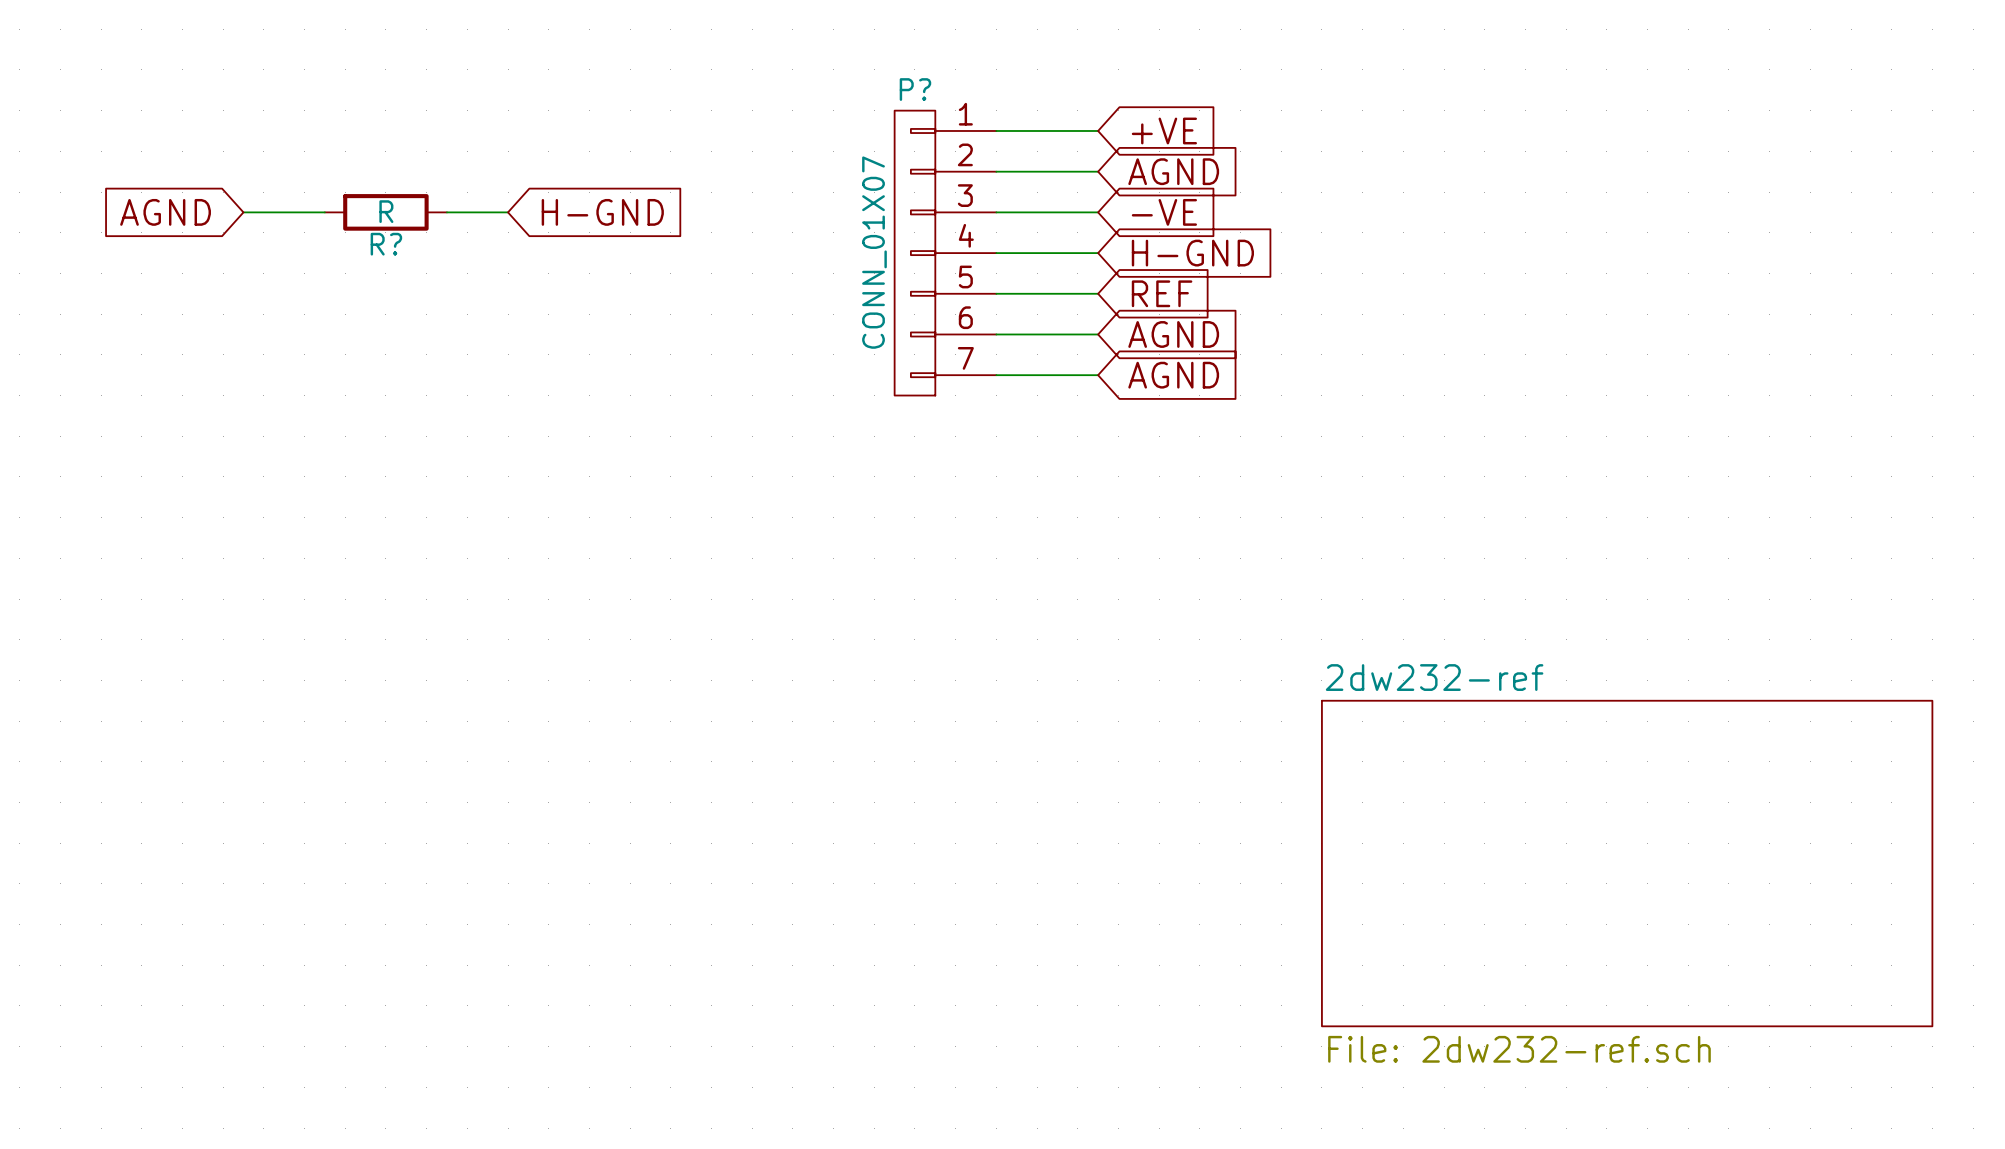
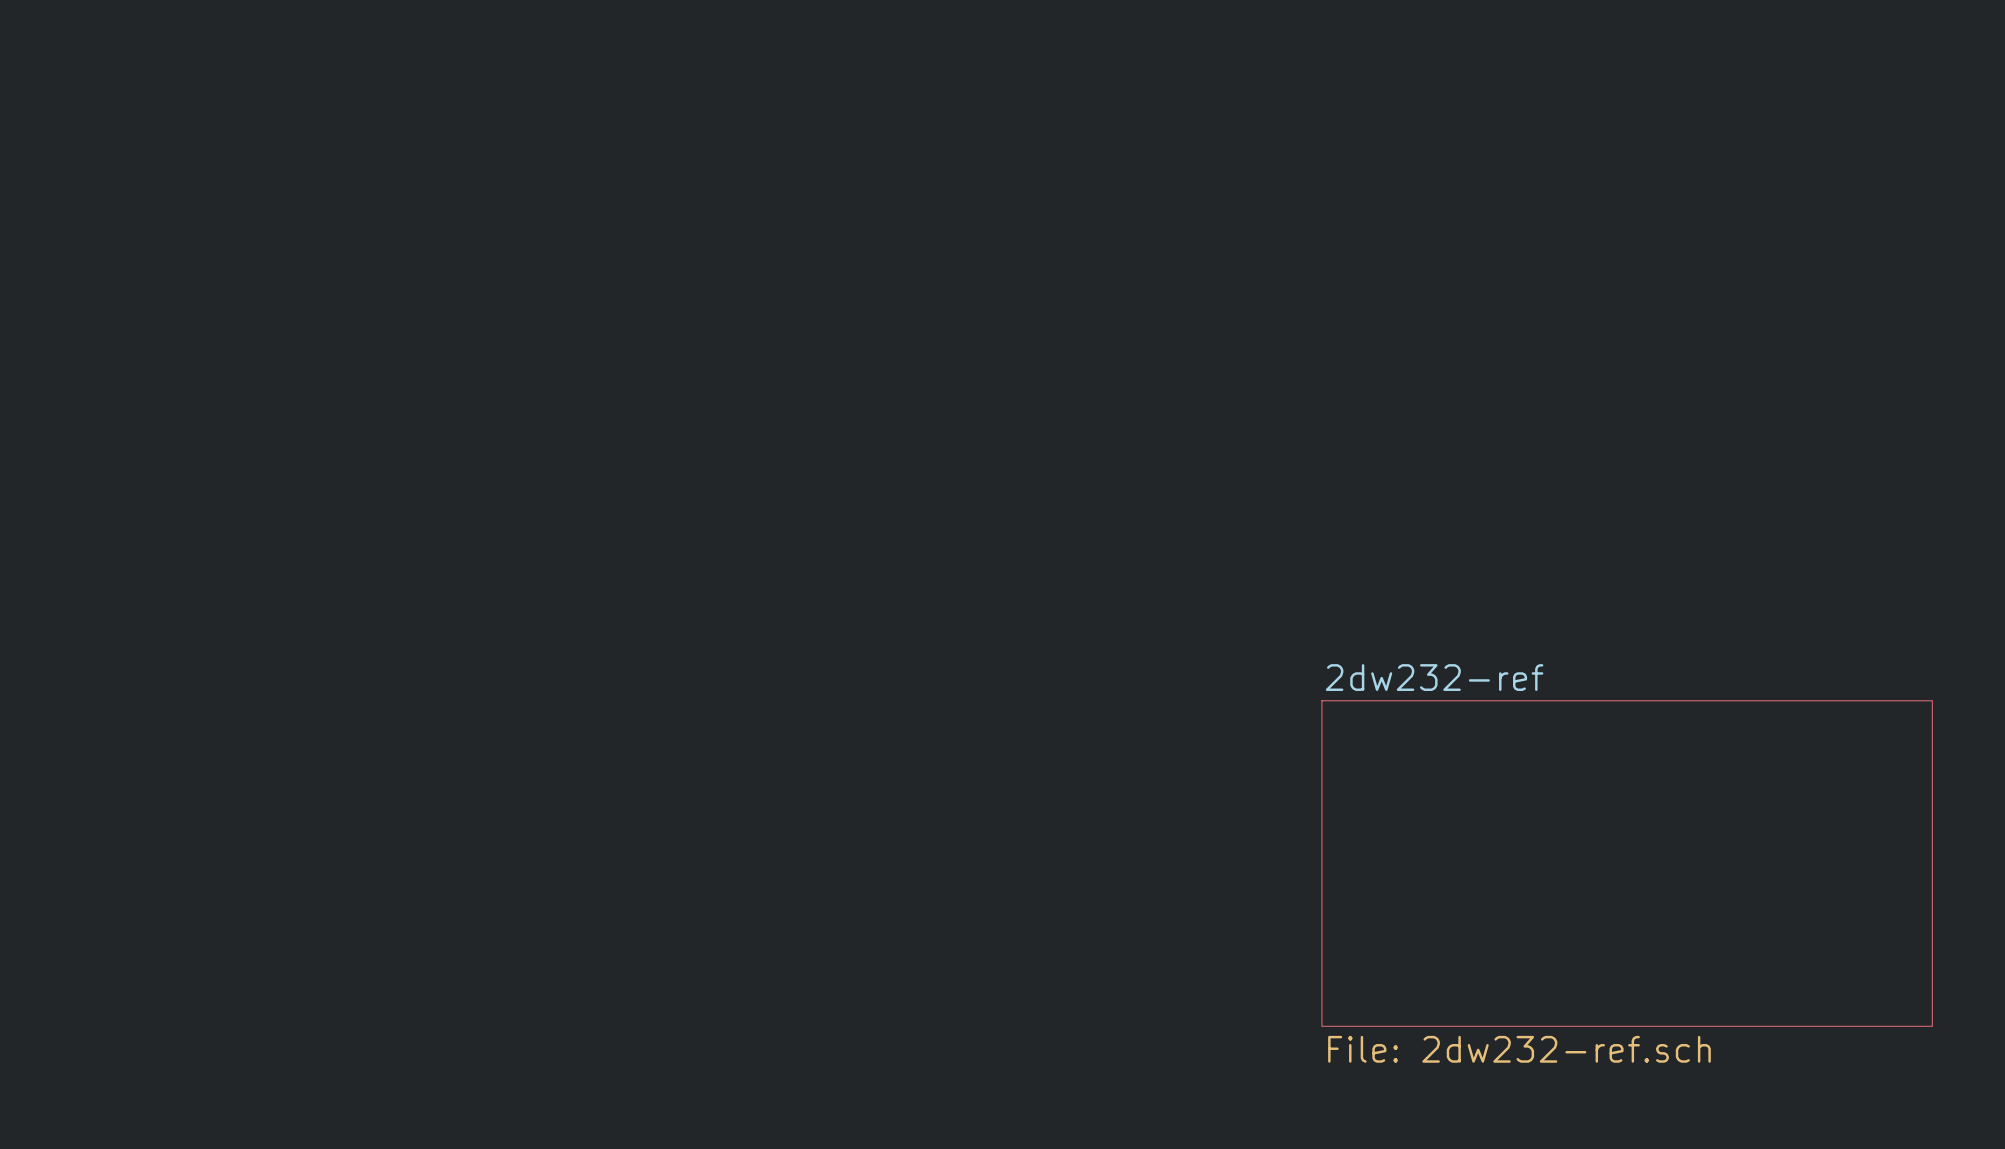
wire: (996, 130) (1098, 130) -> none
global label: +VE (1164, 130) -> none
wire: (996, 171) (1098, 171) -> none
global label: AGND (1173, 171) -> none
global label: AGND (165, 212) -> none
wire: (243, 212) (324, 212) -> none
R?: R (385, 212) -> none
wire: (446, 212) (508, 212) -> none
global label: H-GND (602, 212) -> none
wire: (996, 212) (1098, 212) -> none
global label: -VE (1164, 212) -> none
P?: CONN_01X07 (945, 253) -> none
wire: (996, 253) (1098, 253) -> none
global label: H-GND (1192, 253) -> none
wire: (996, 293) (1098, 293) -> none
global label: REF (1162, 293) -> none
wire: (996, 334) (1098, 334) -> none
global label: AGND (1173, 334) -> none
wire: (996, 375) (1098, 375) -> none
global label: AGND (1173, 375) -> none

